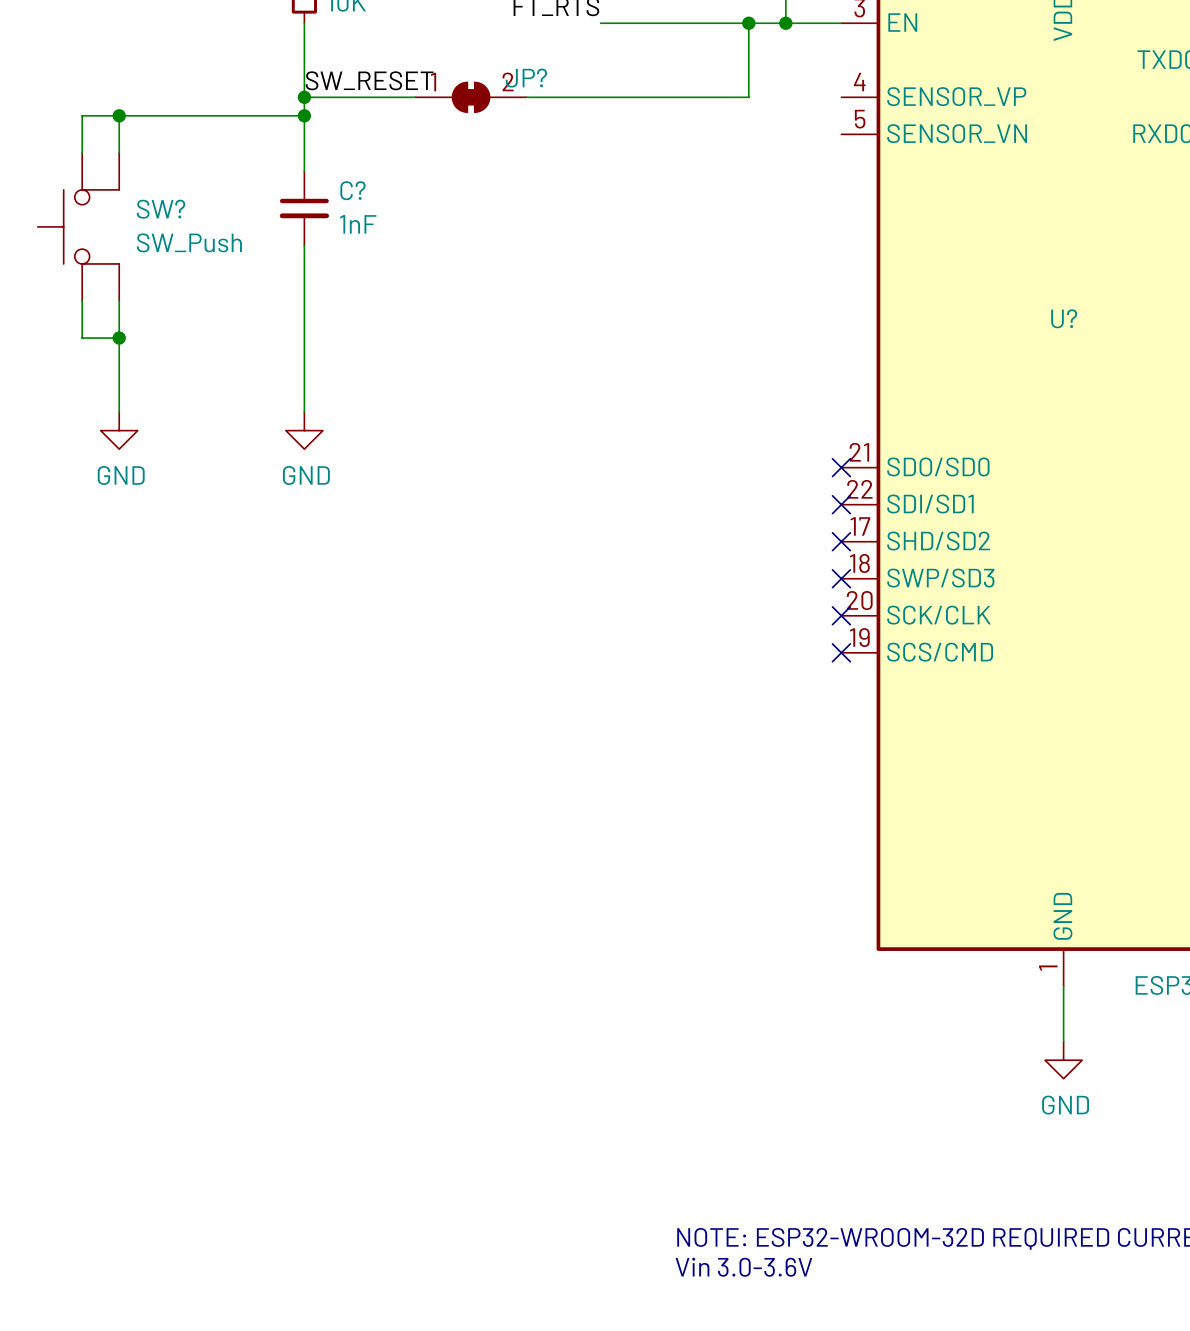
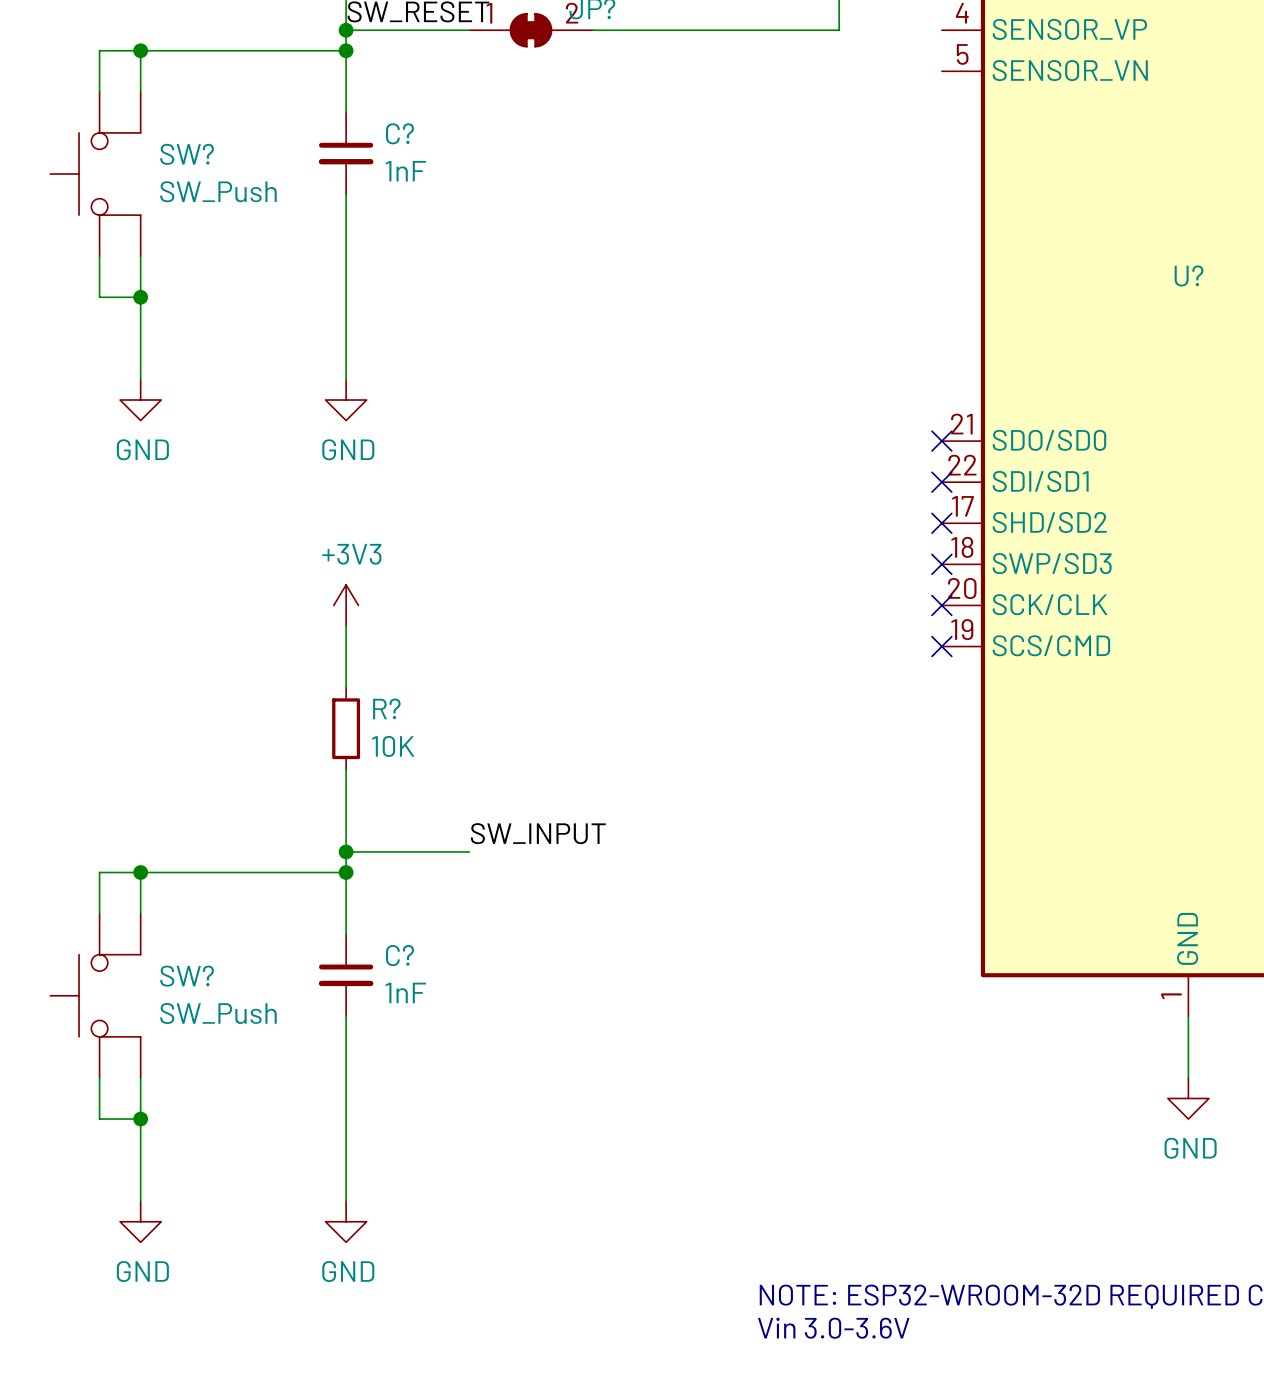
power symbol: none -> +3V3 (346, 605)
wire: none -> (346, 625) (346, 687)
R?: none -> 10K (346, 728)
wire: none -> (346, 769) (346, 934)
label: none -> SW_INPUT (538, 833)
wire: none -> (346, 851) (469, 851)
junction: none -> (346, 851)
wire: none -> (140, 872) (140, 913)
junction: none -> (140, 872)
wire: none -> (346, 872) (99, 872) (99, 913)
junction: none -> (346, 872)
C?: none -> 1nF (346, 975)
SW?: none -> SW_Push (95, 995)
wire: none -> (346, 1016) (346, 1201)
wire: none -> (99, 1077) (99, 1119) (140, 1119)
wire: none -> (140, 1077) (140, 1201)
junction: none -> (140, 1119)
power symbol: none -> GND (140, 1221)
power symbol: none -> GND (346, 1221)

